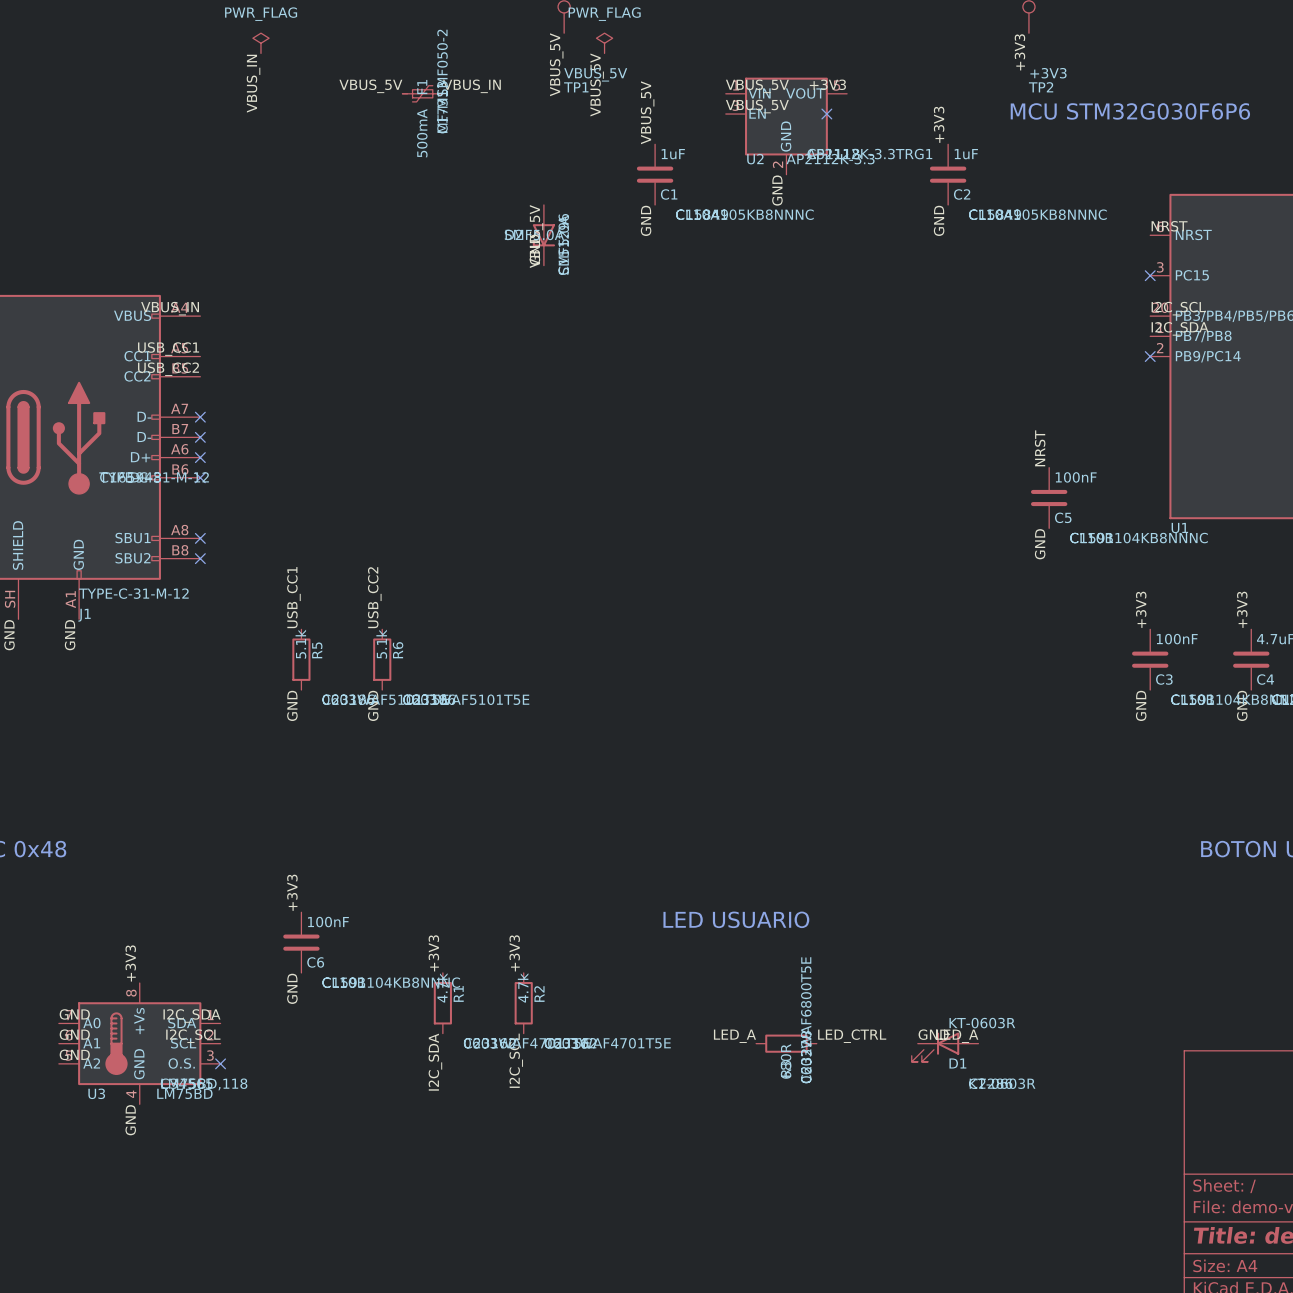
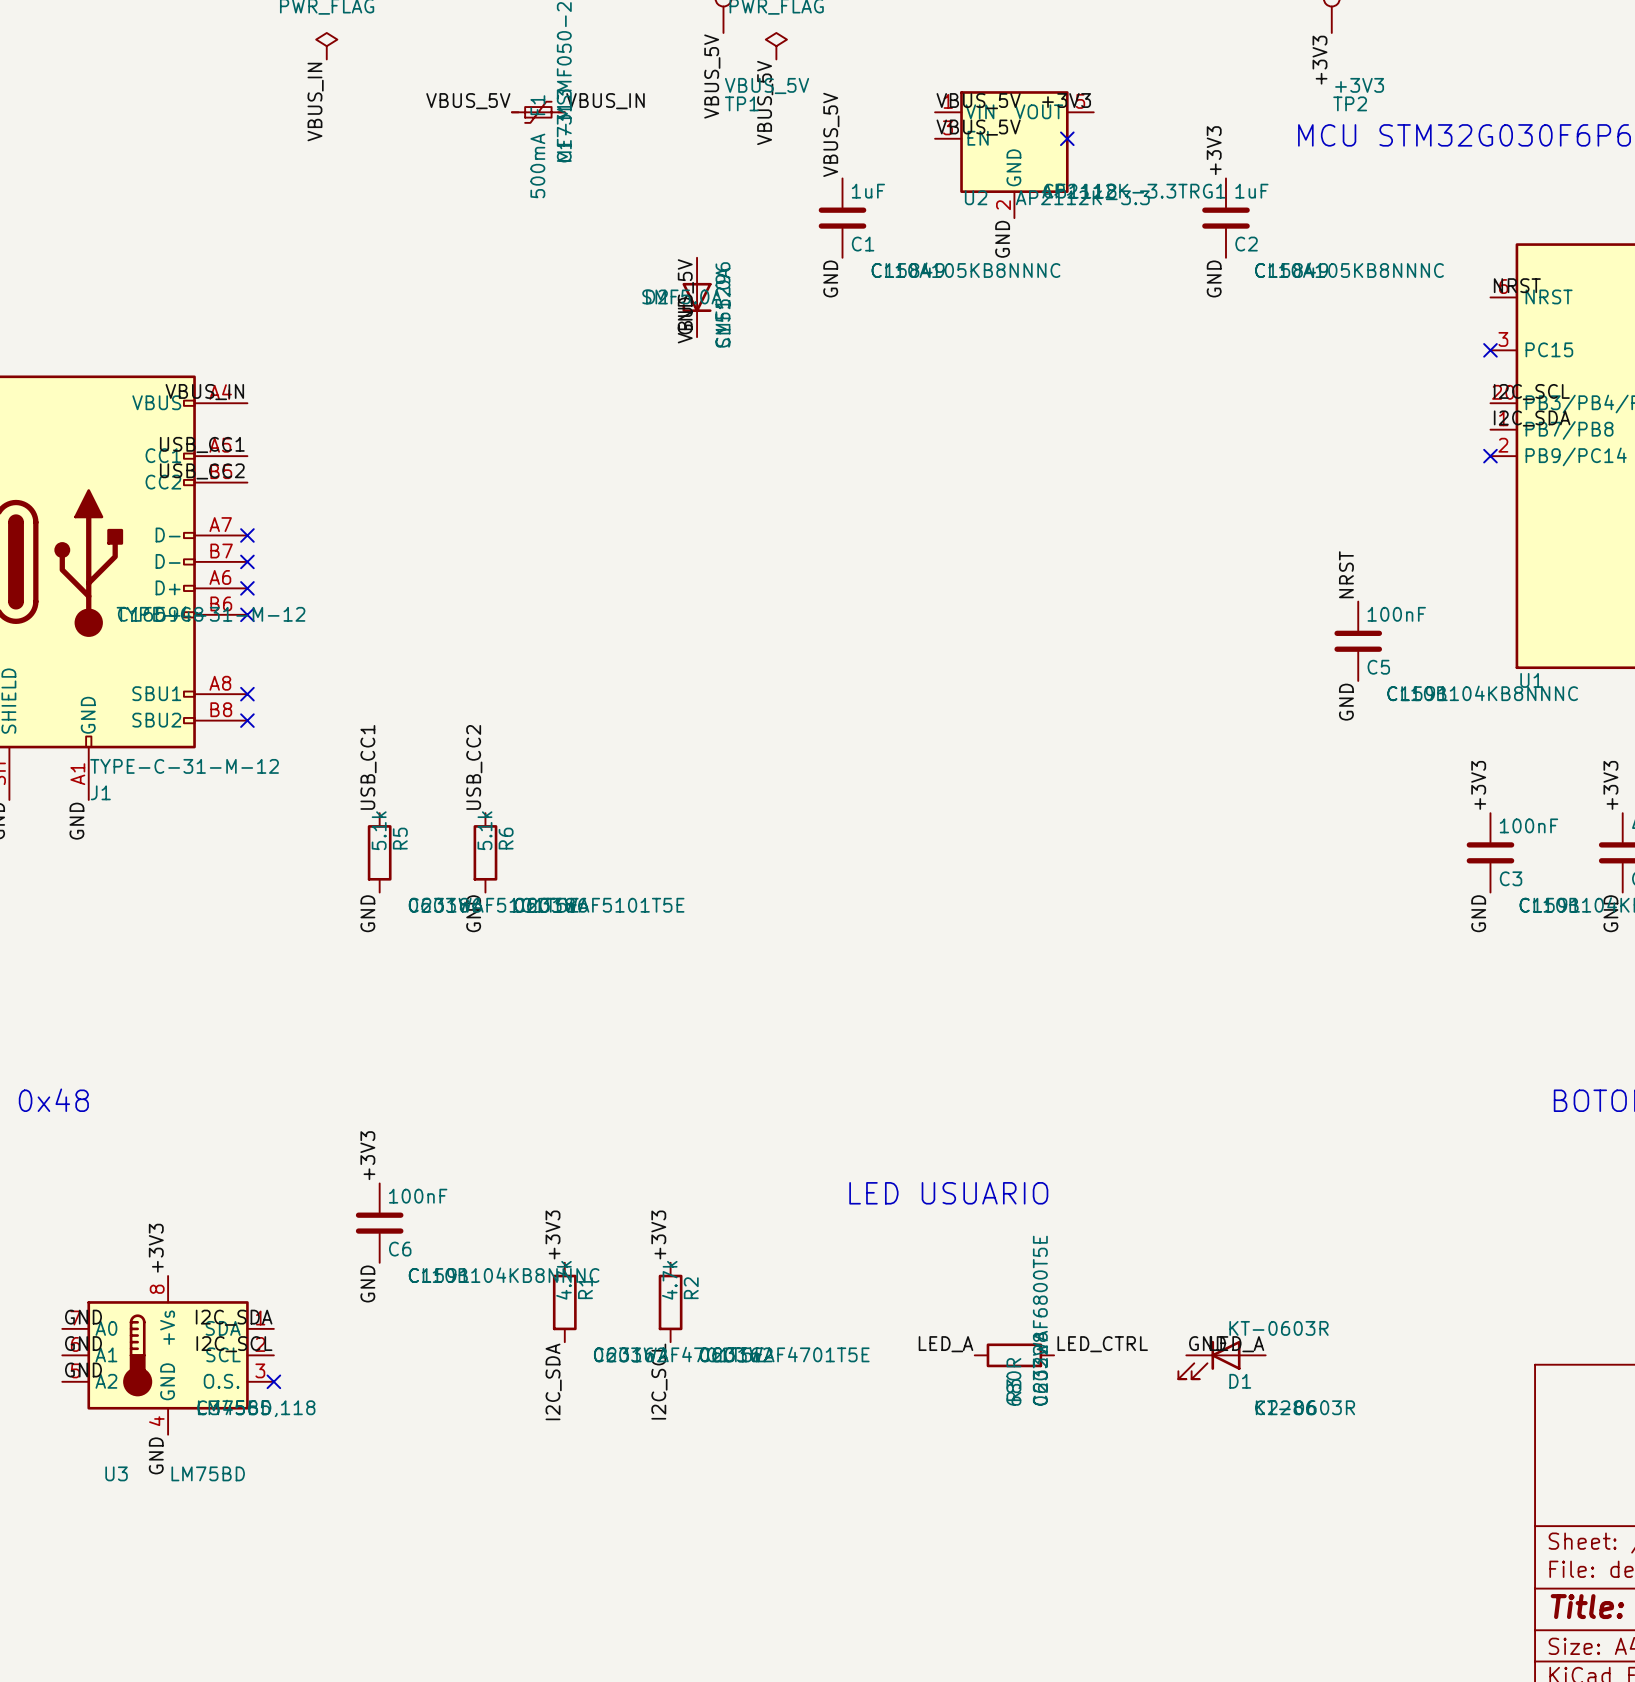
U3 name position: U3 (96, 1093) -> U3 (116, 1473)
U3 value position: LM75BD (184, 1093) -> LM75BD (208, 1473)

